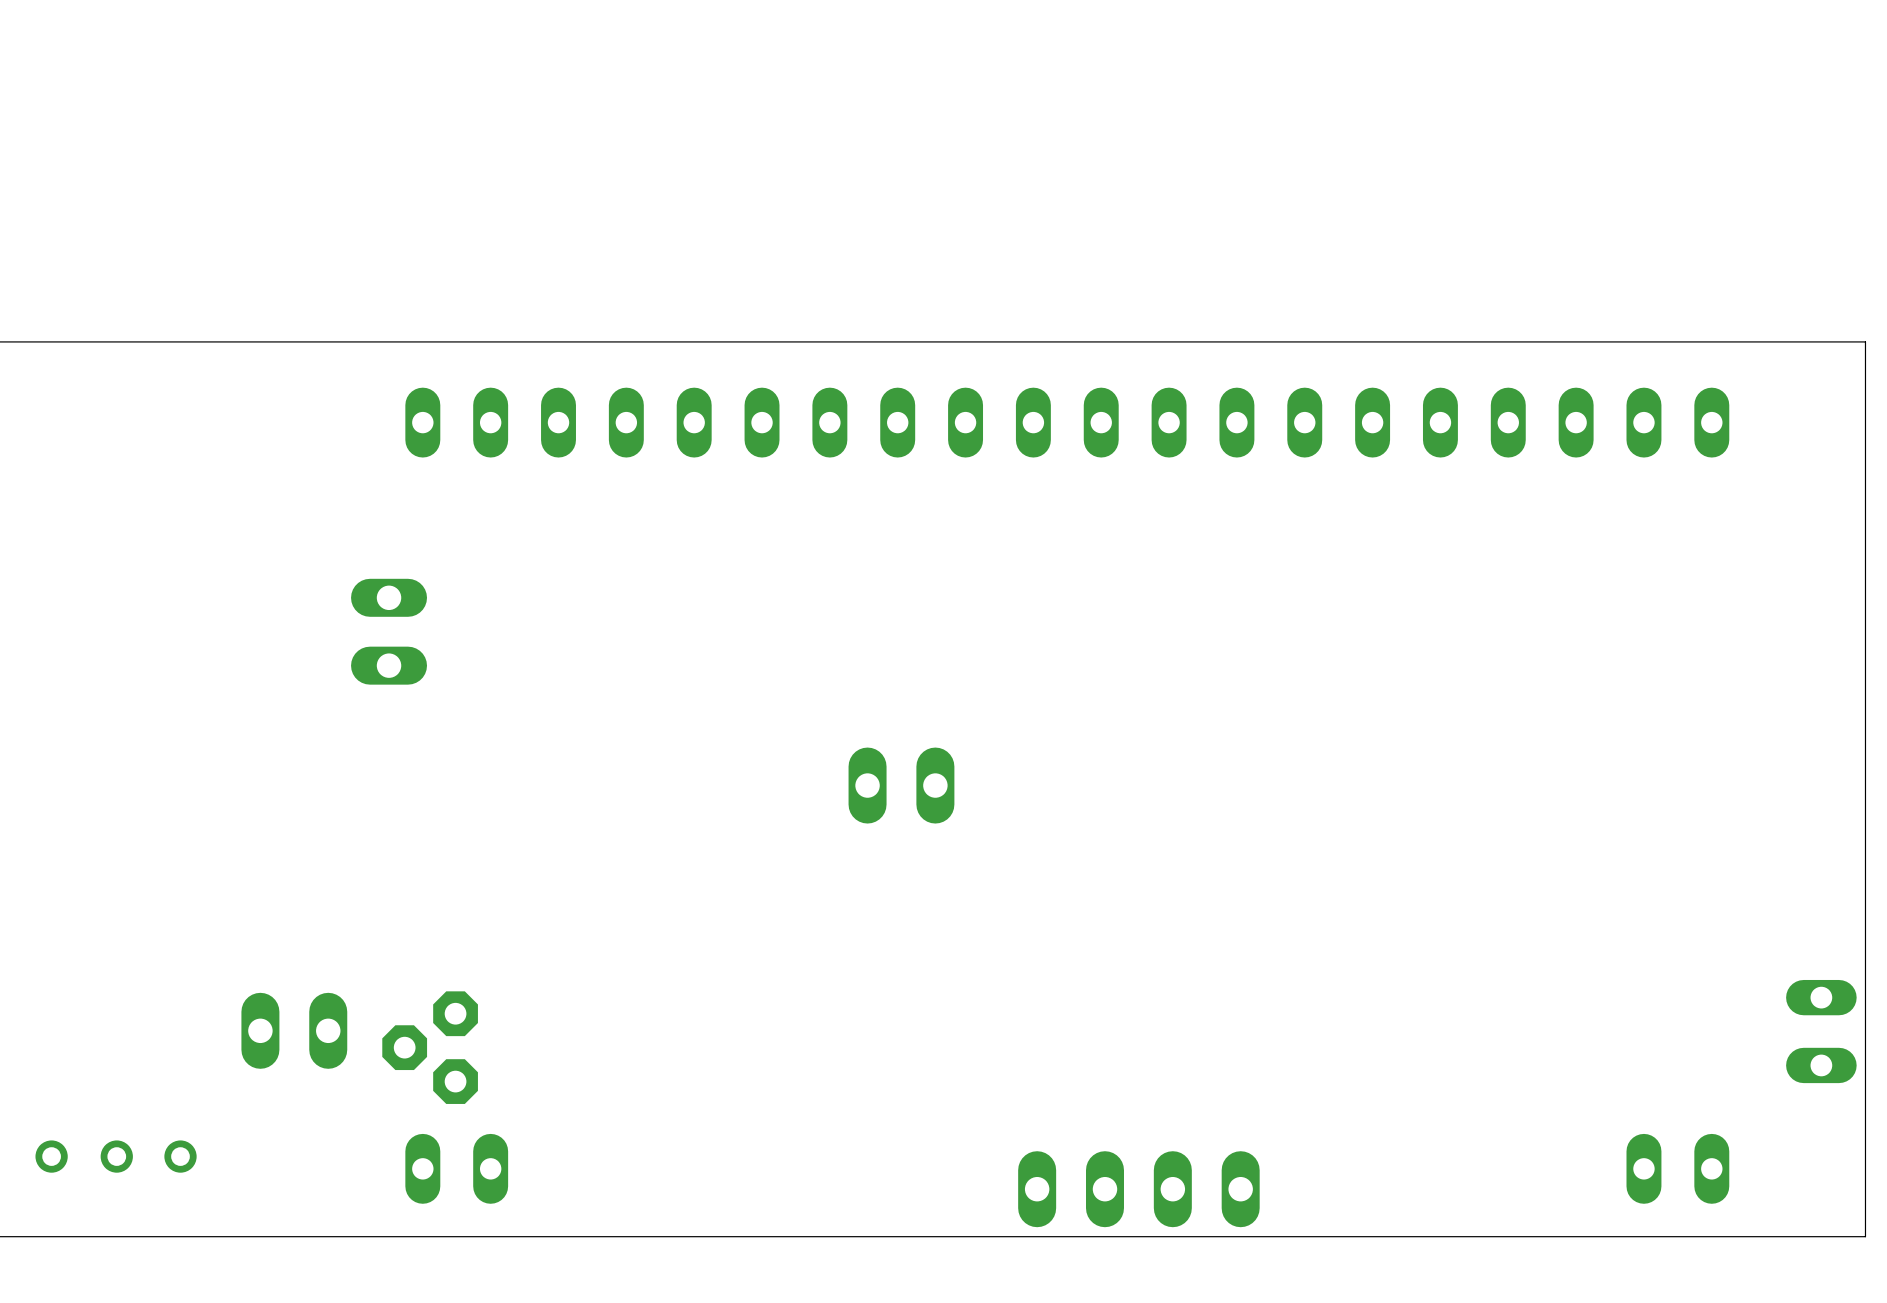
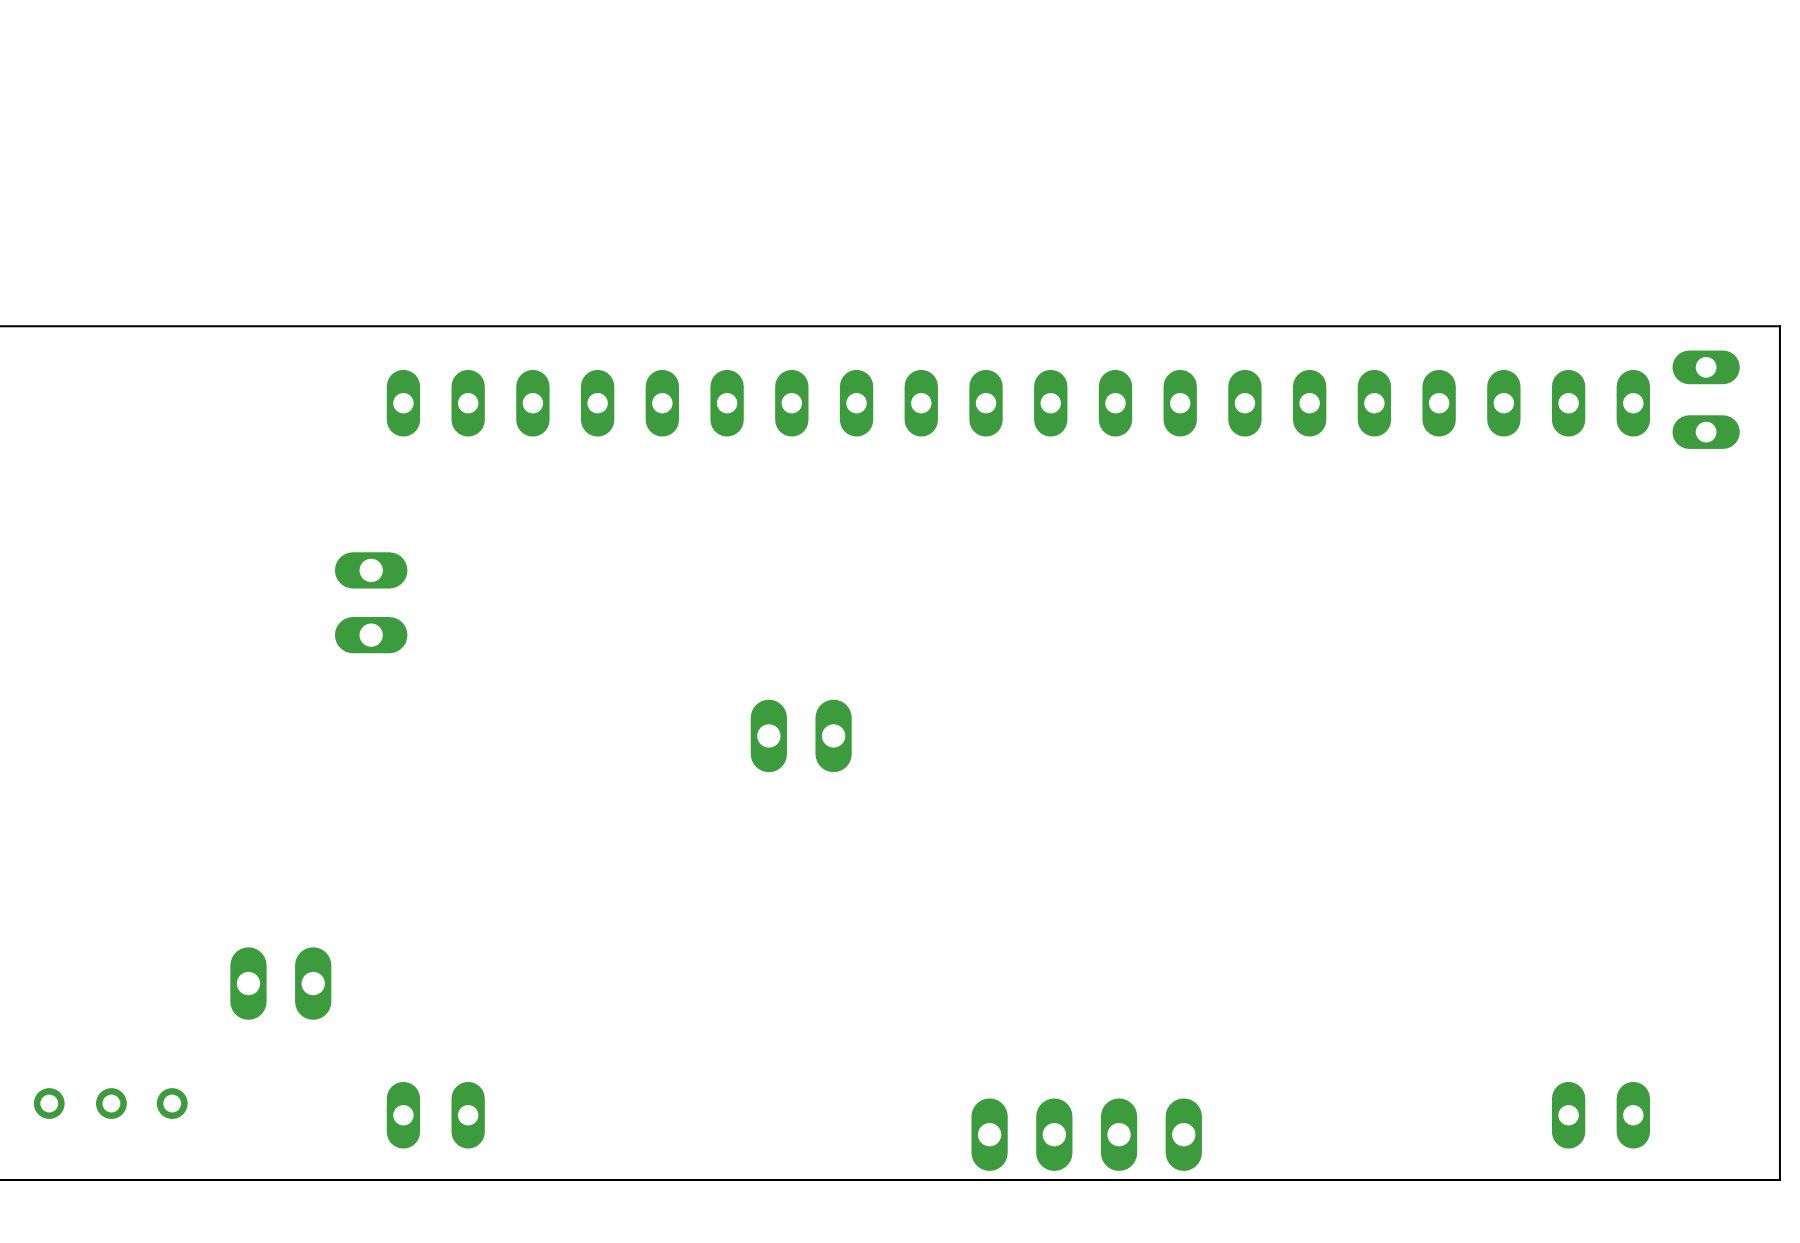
part position: (901, 785) -> (801, 735)
part position: (1821, 1031) -> (1706, 399)
part: (430, 1047) -> none

